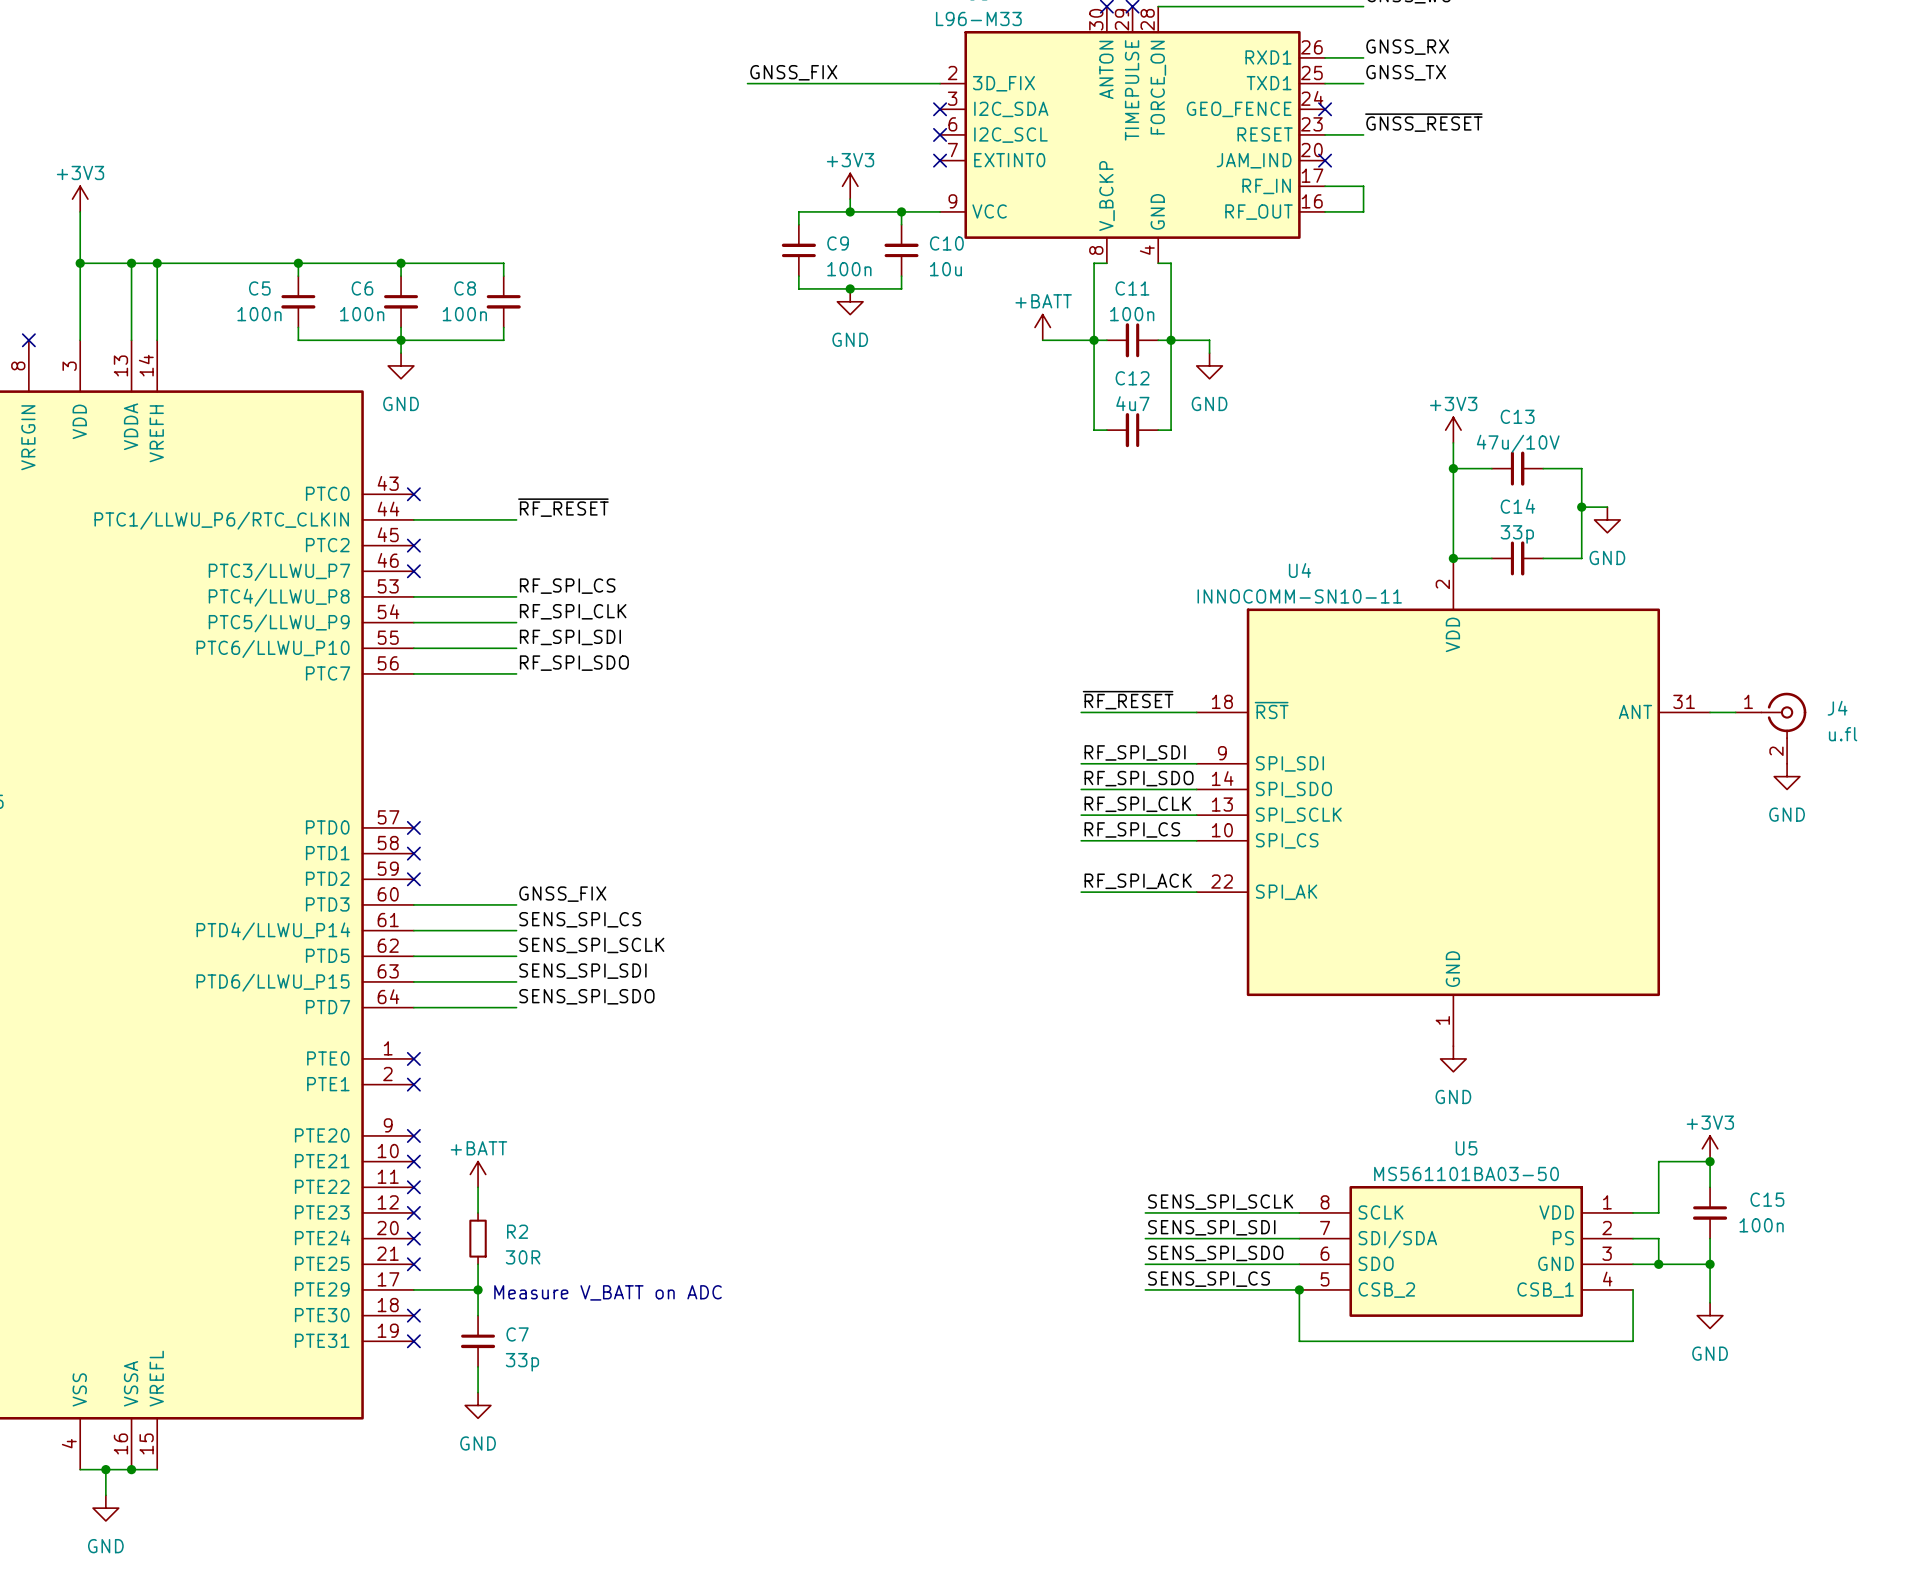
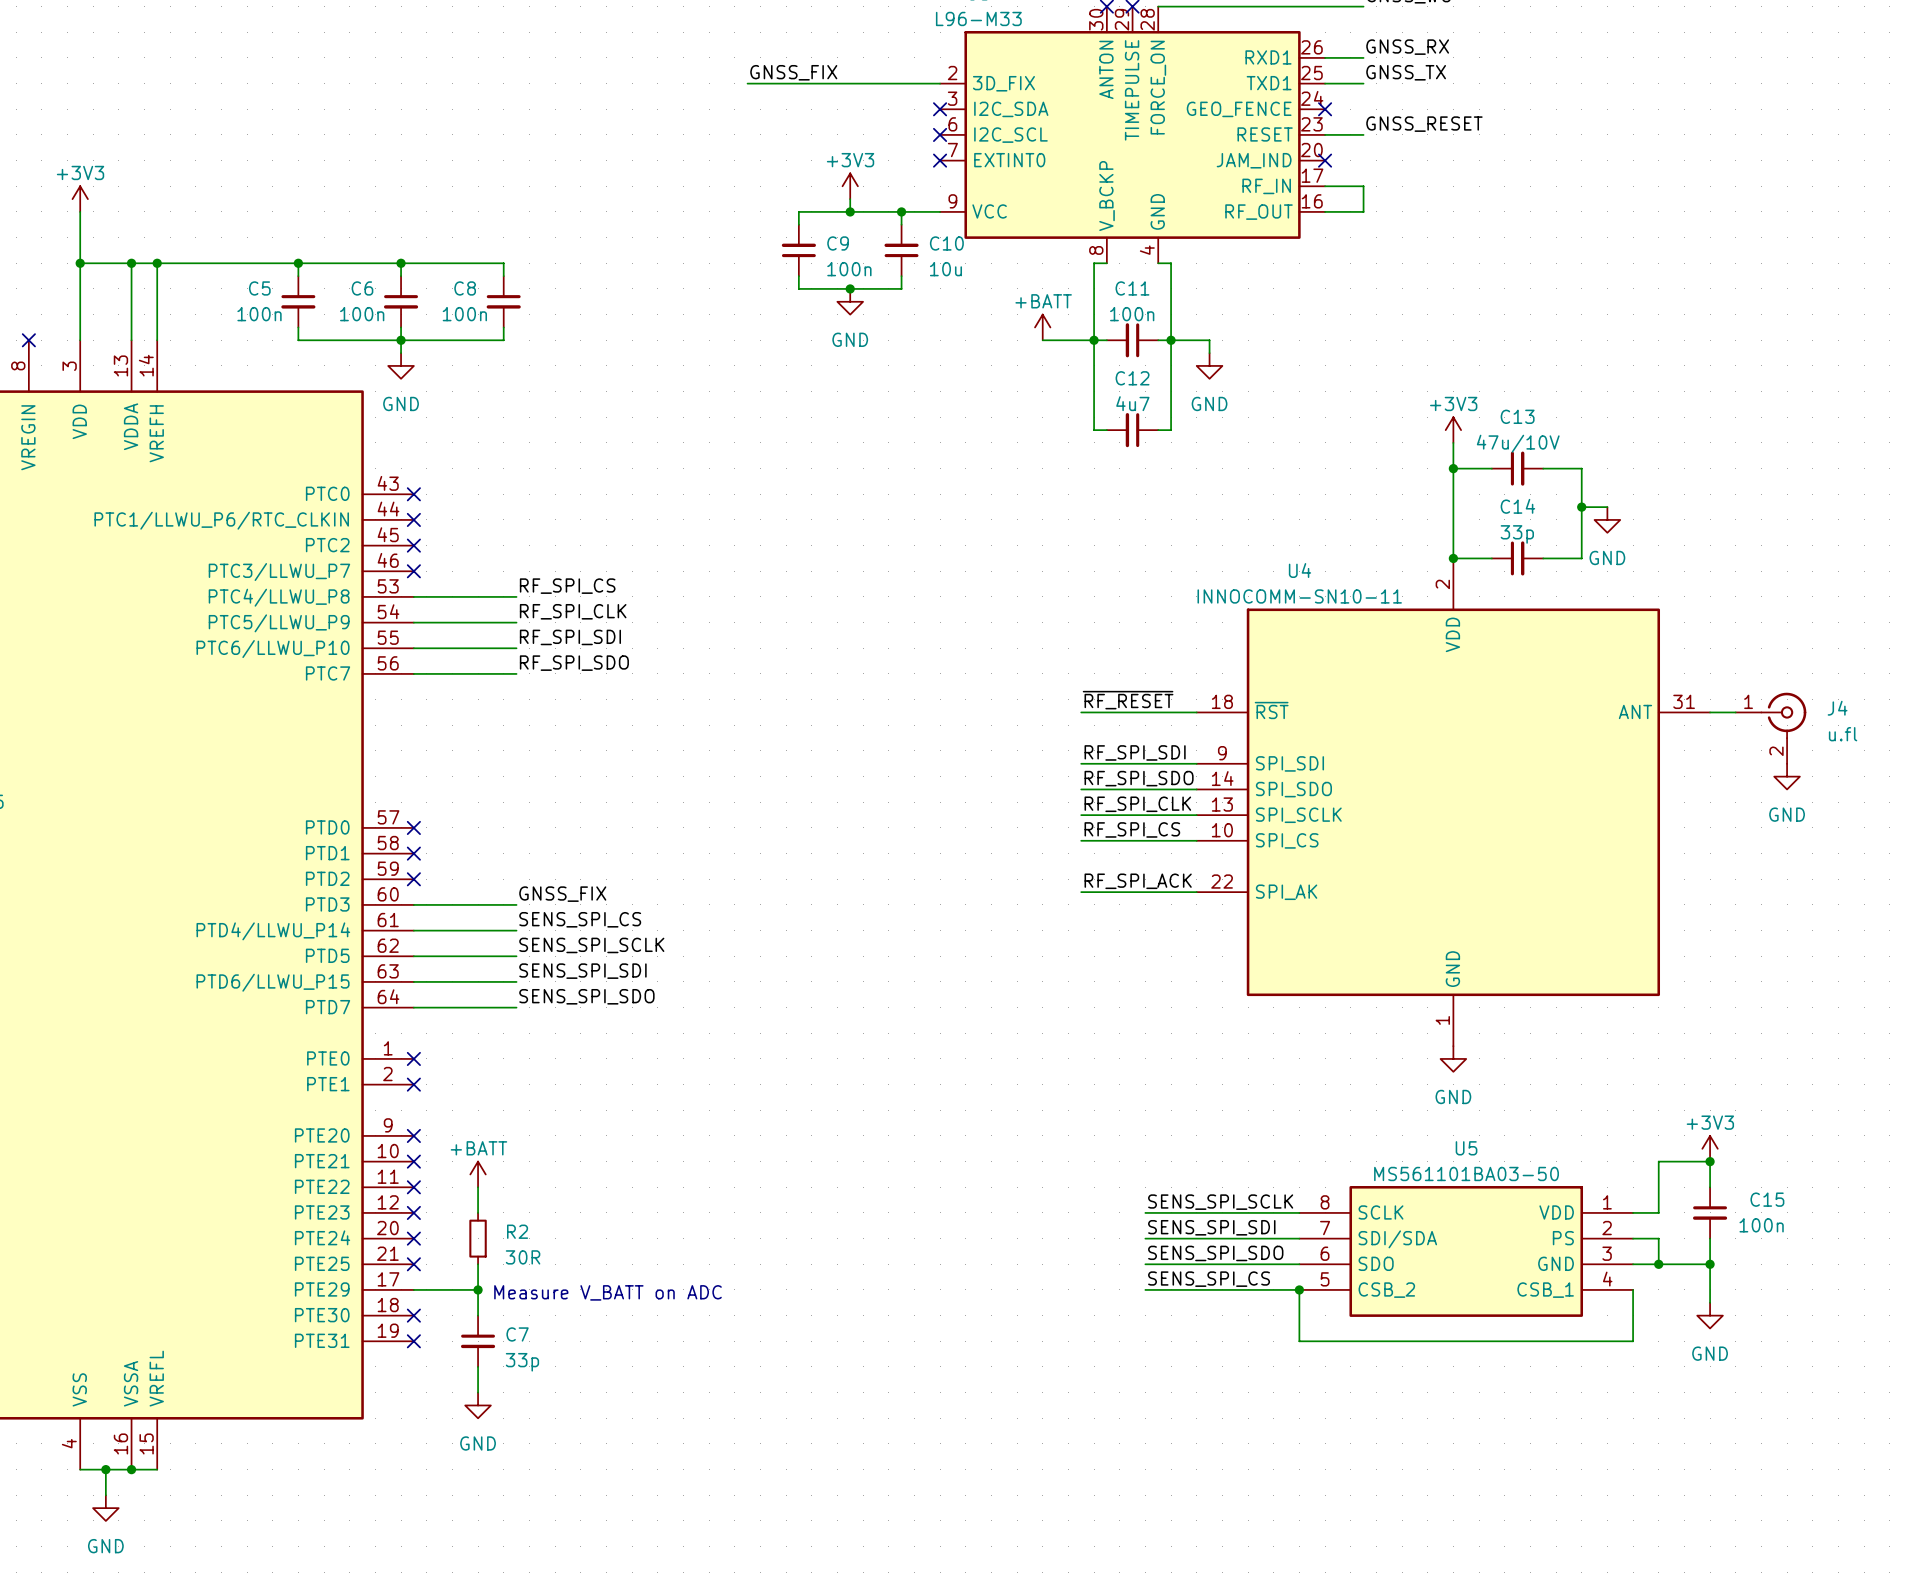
label: ~{GNSS_RESET} (1423, 122) -> GNSS_RESET (1424, 124)
label: ~{RF_RESET} (563, 507) -> none
wire: (413, 519) (516, 519) -> none
no-connect mark: none -> (413, 519)

